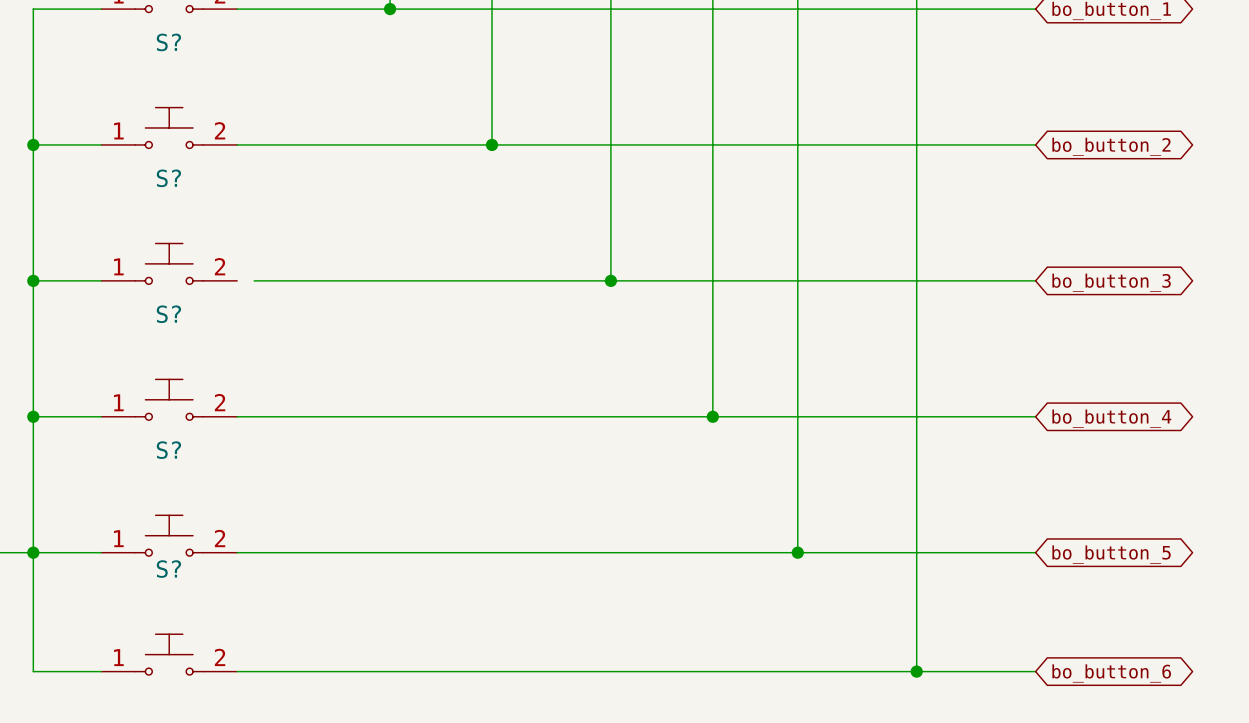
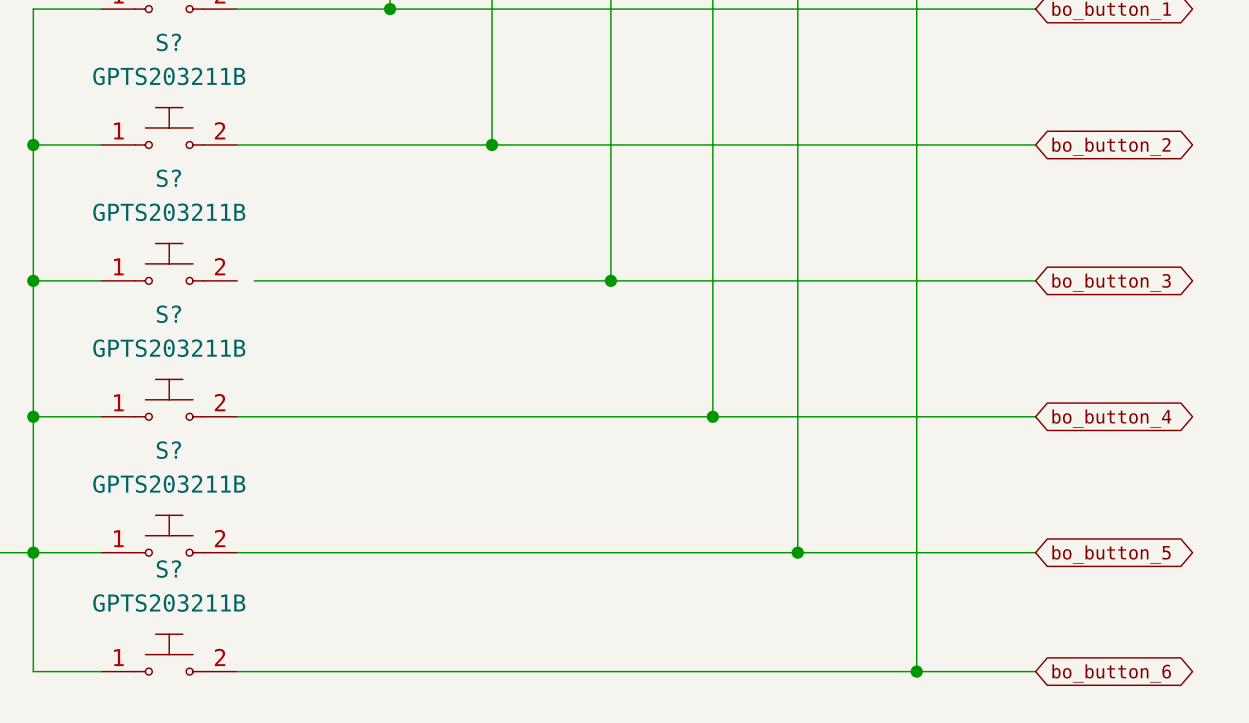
S? value: none -> GPTS203211B (169, 76)
S? value: none -> GPTS203211B (169, 212)
S? value: none -> GPTS203211B (169, 348)
S? value: none -> GPTS203211B (169, 484)
S? value: none -> GPTS203211B (169, 603)

